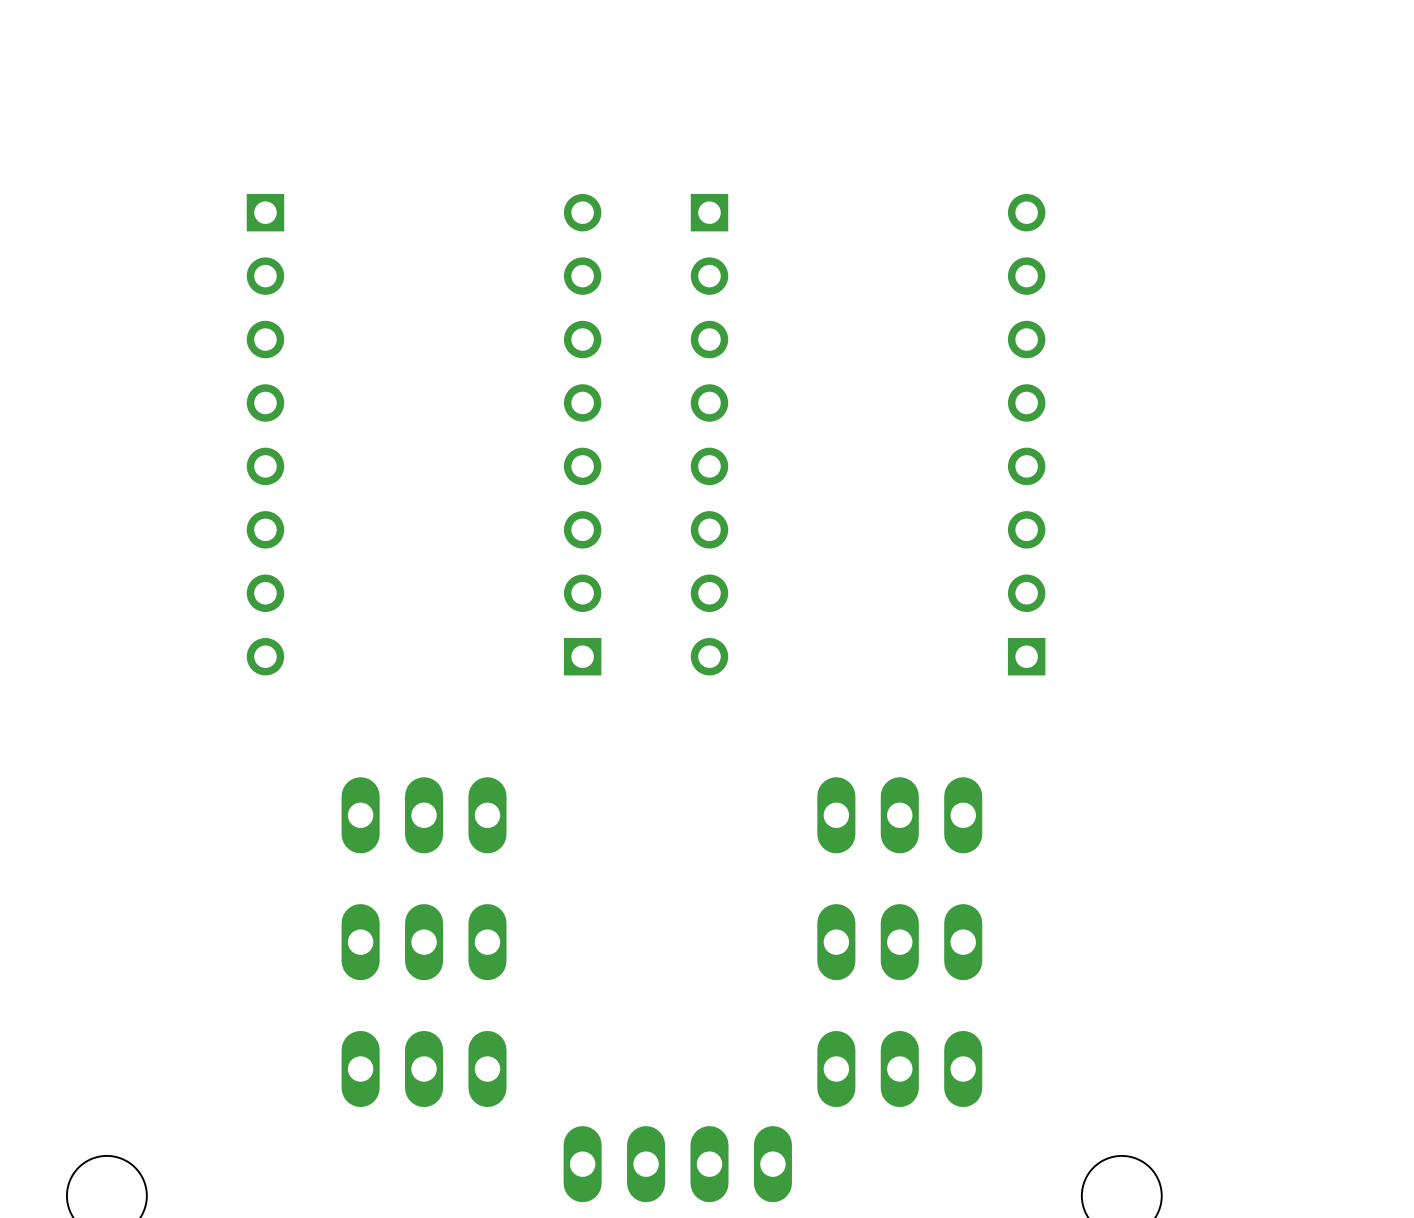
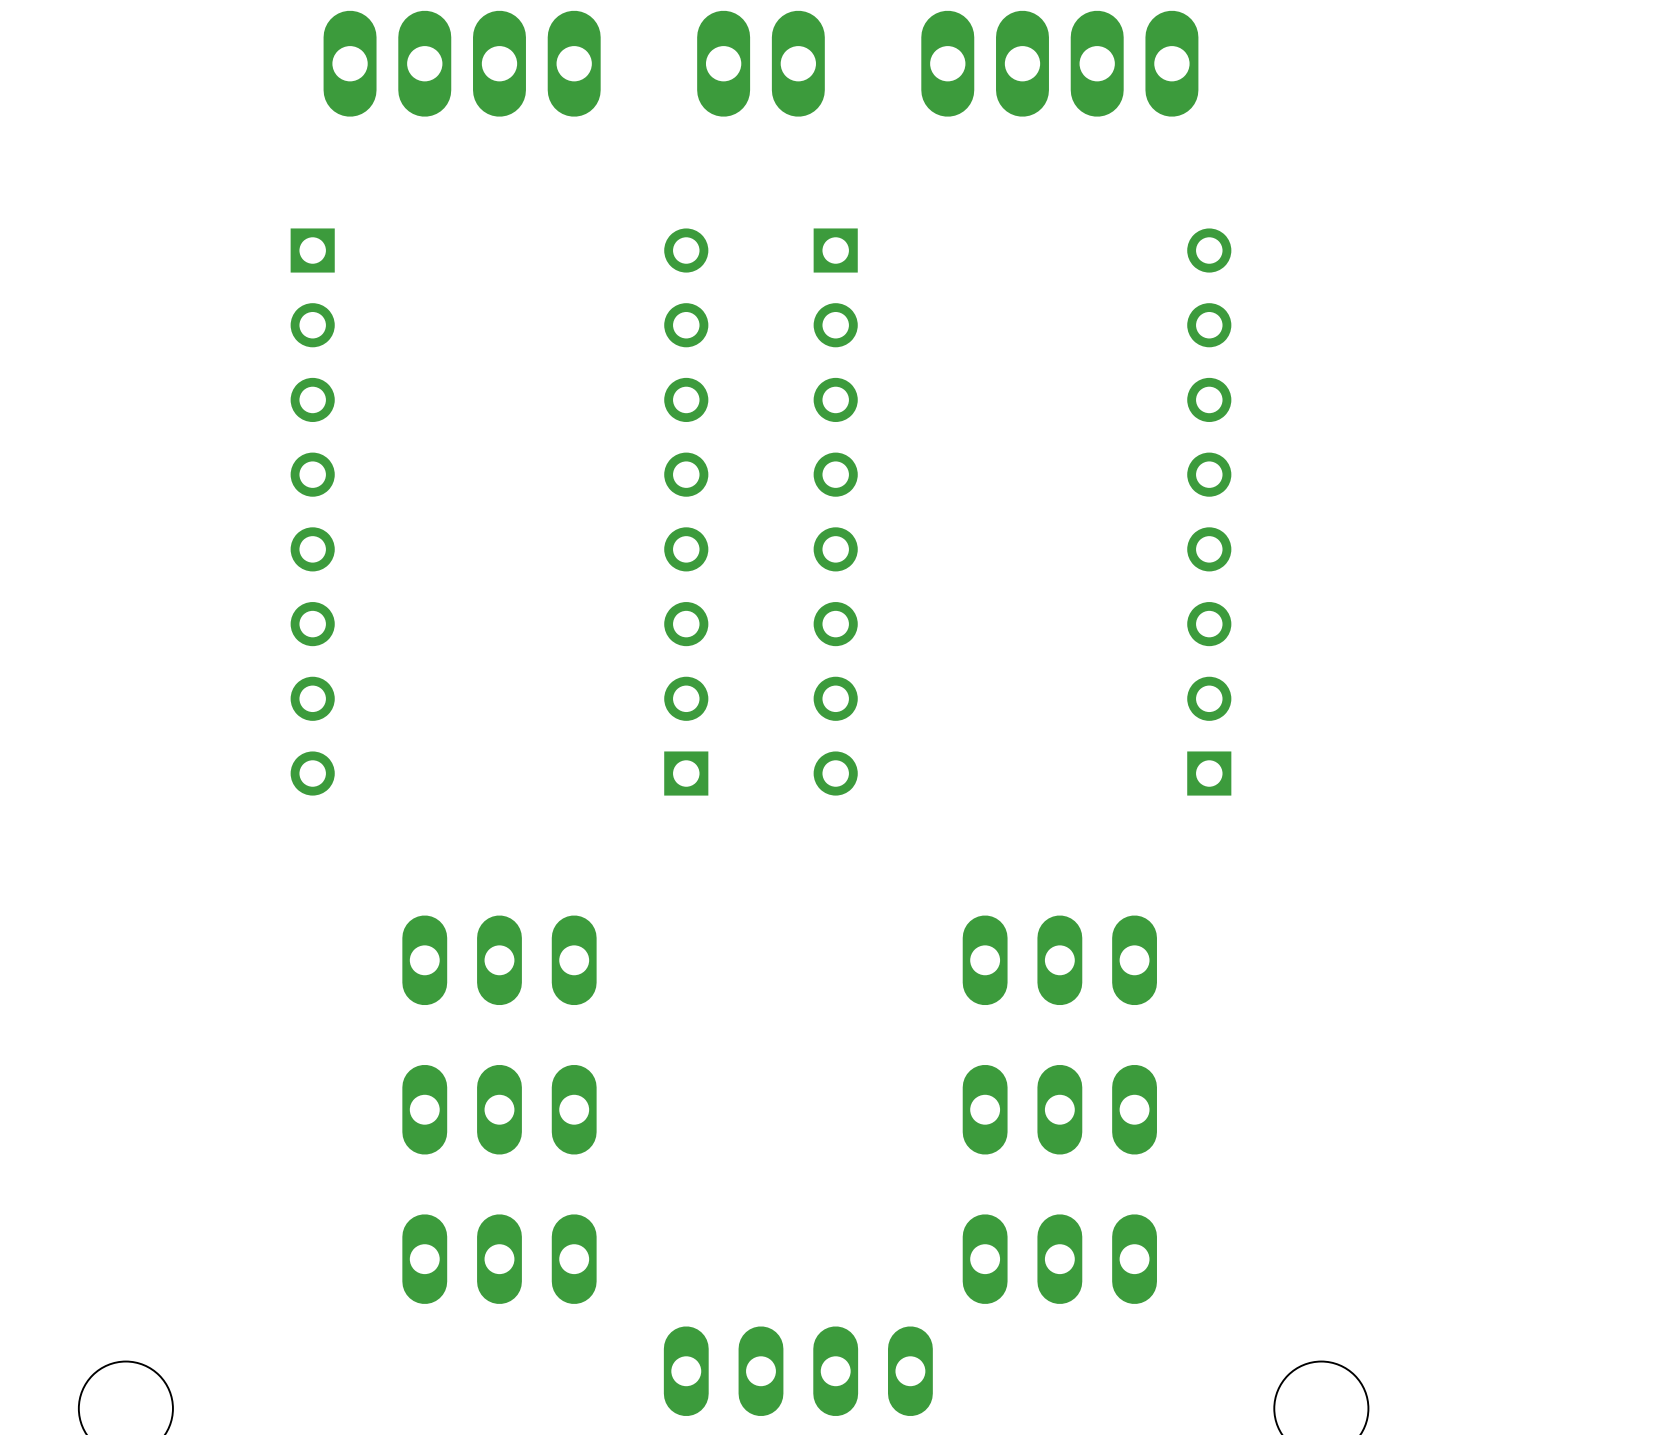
part: none -> (462, 63)
part: none -> (760, 63)
part: none -> (1059, 63)

